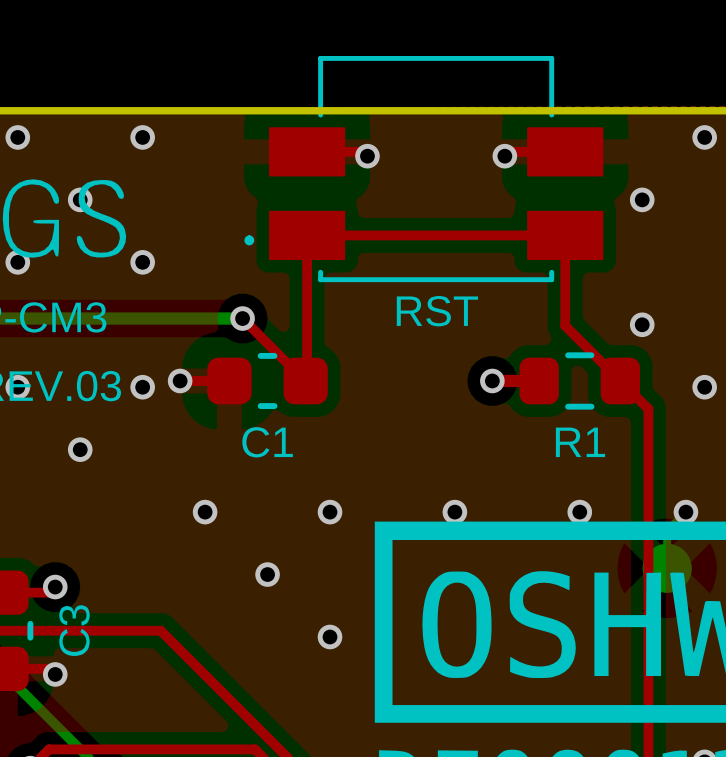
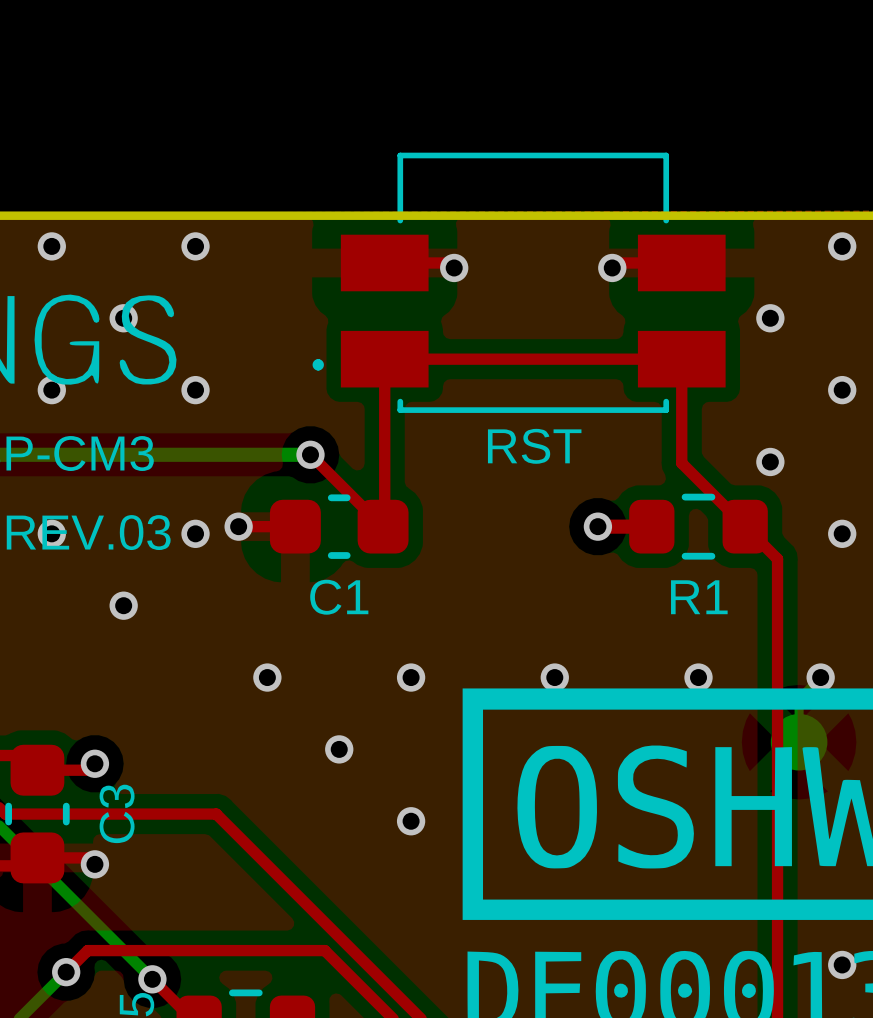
via: none -> (842, 390)

